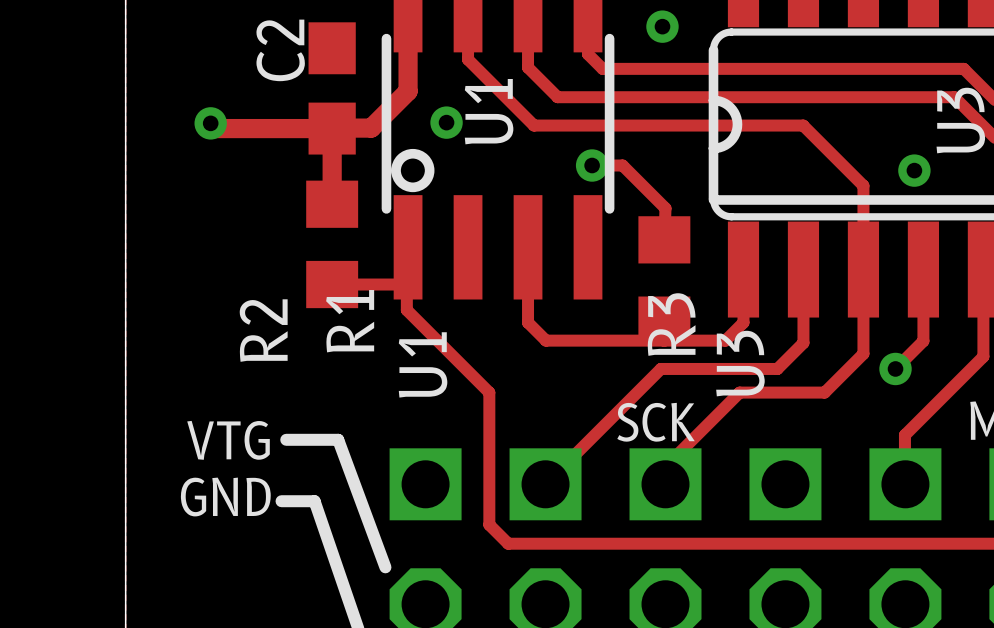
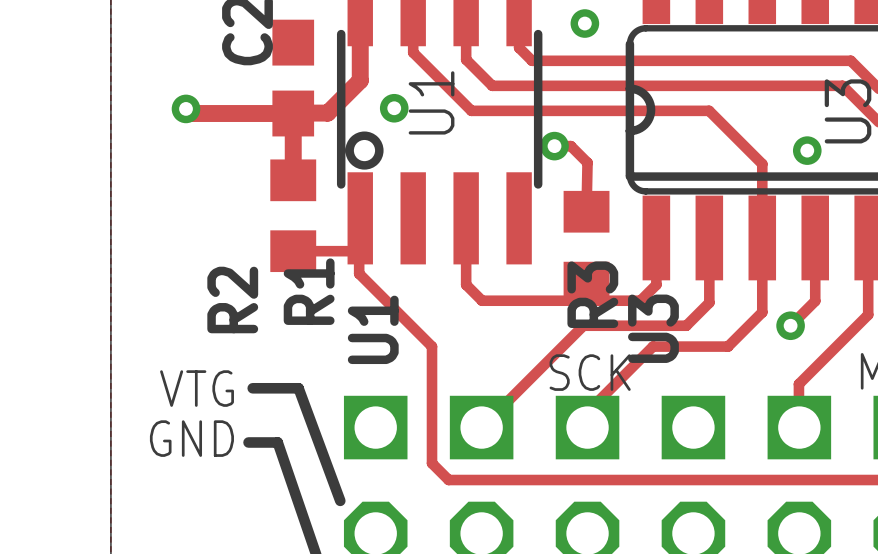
track: (590, 165) (622, 165) (665, 208) (664, 239) -> (554, 146) (570, 146) (587, 162) (586, 211)
via position: (592, 165) -> (554, 146)

